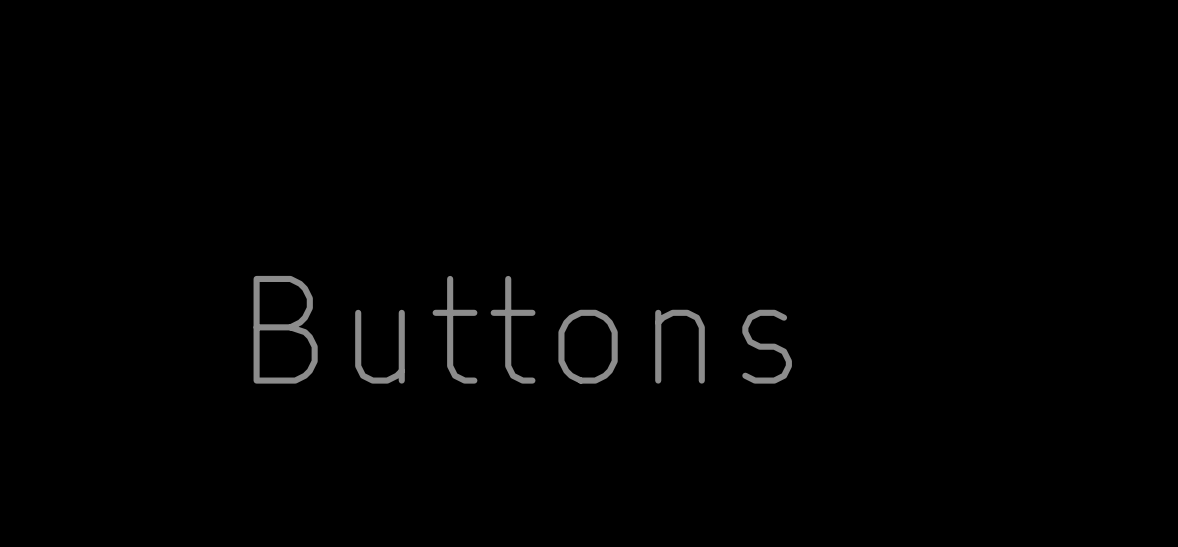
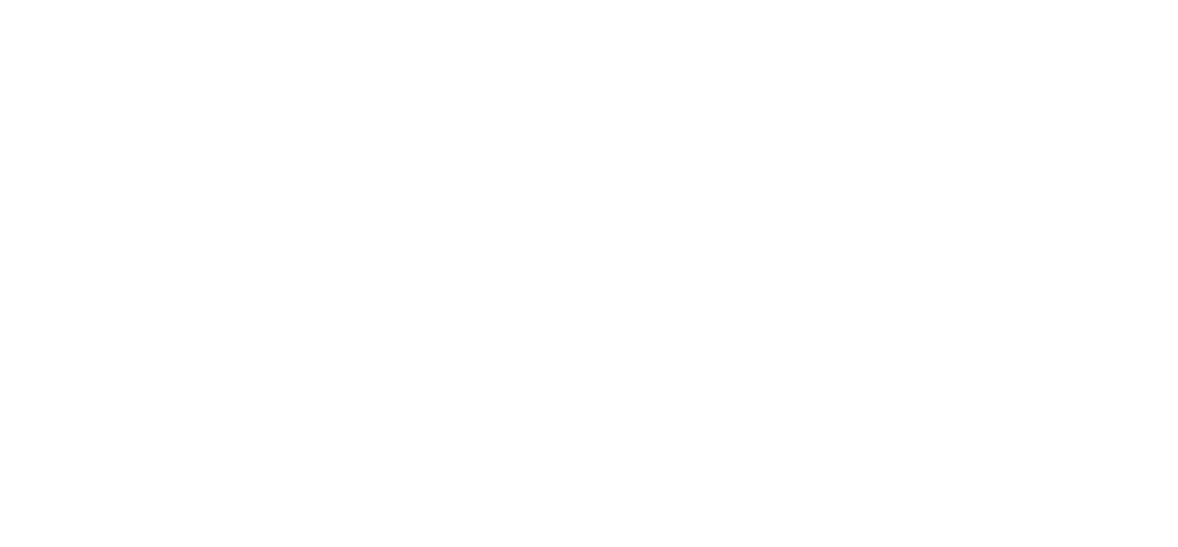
text: Buttons (522, 329) -> none

